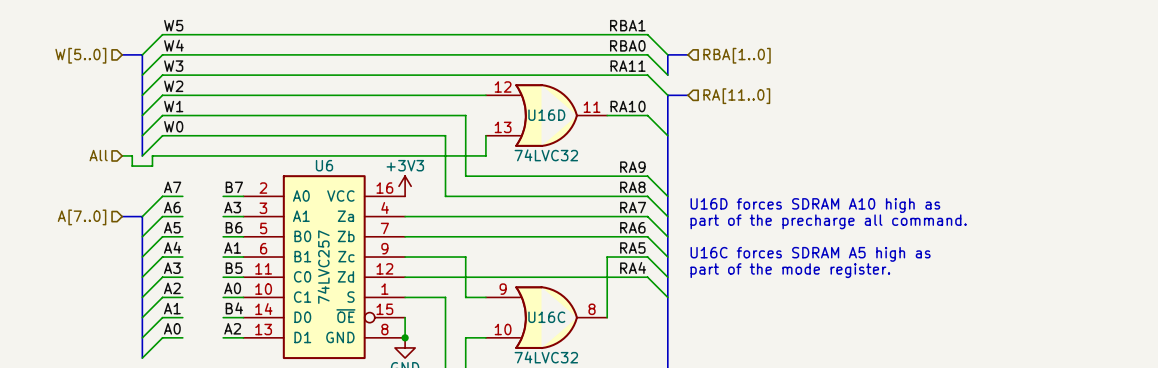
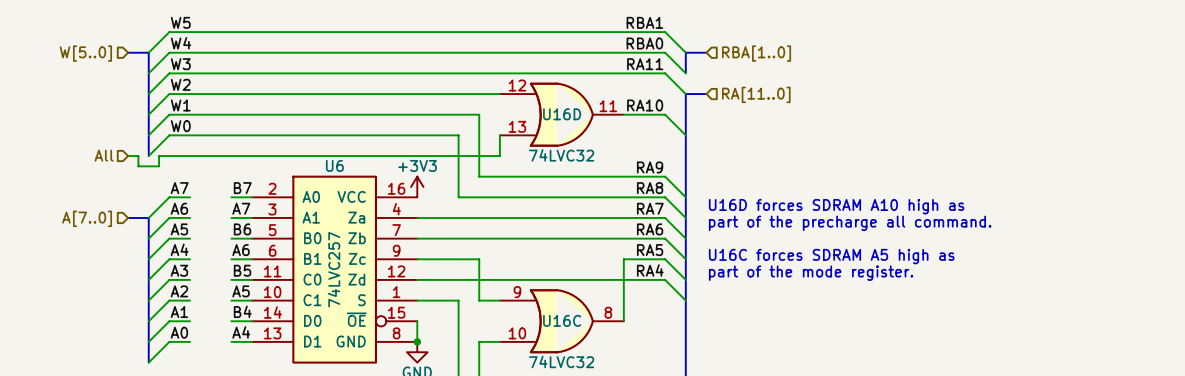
label: A3 (232, 207) -> A7 (241, 208)
label: A1 (232, 247) -> A6 (241, 250)
label: A0 (232, 288) -> A5 (241, 291)
label: A2 (232, 328) -> A4 (241, 332)

